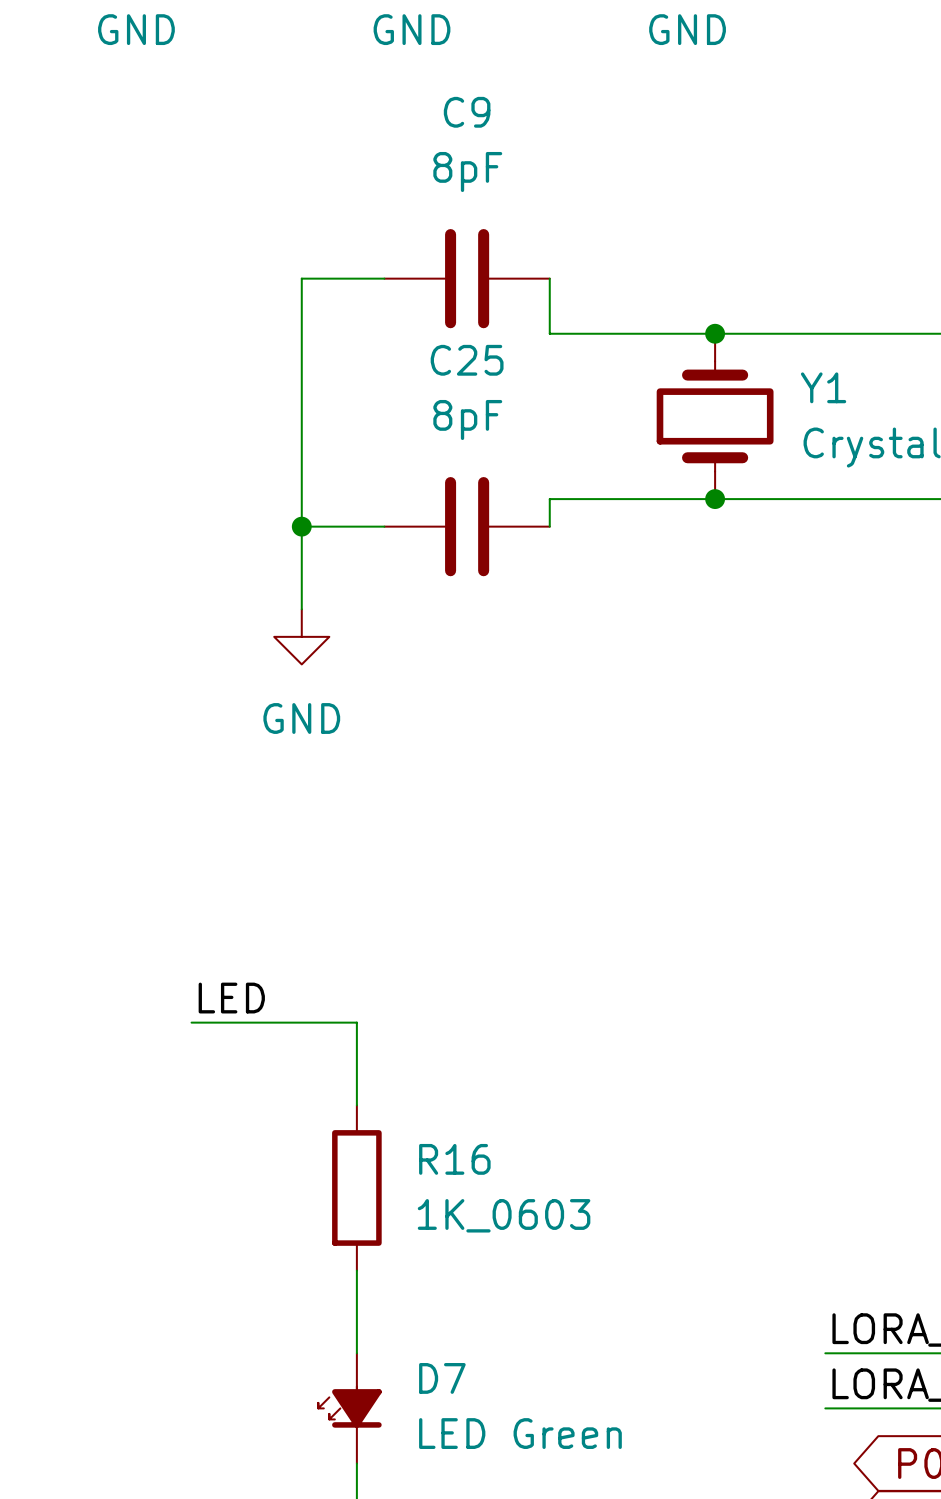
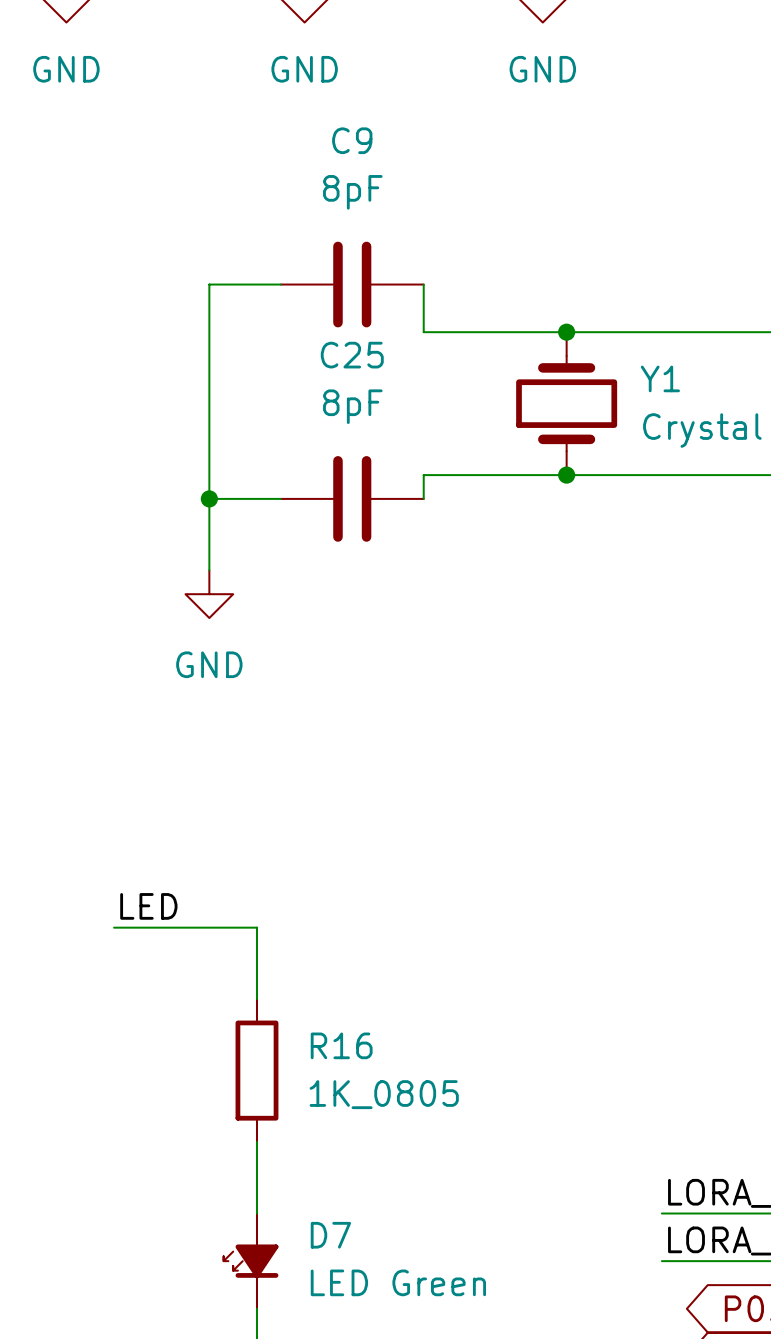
R16 value: 1K_0603 (504, 1215) -> 1K_0805 (384, 1094)

